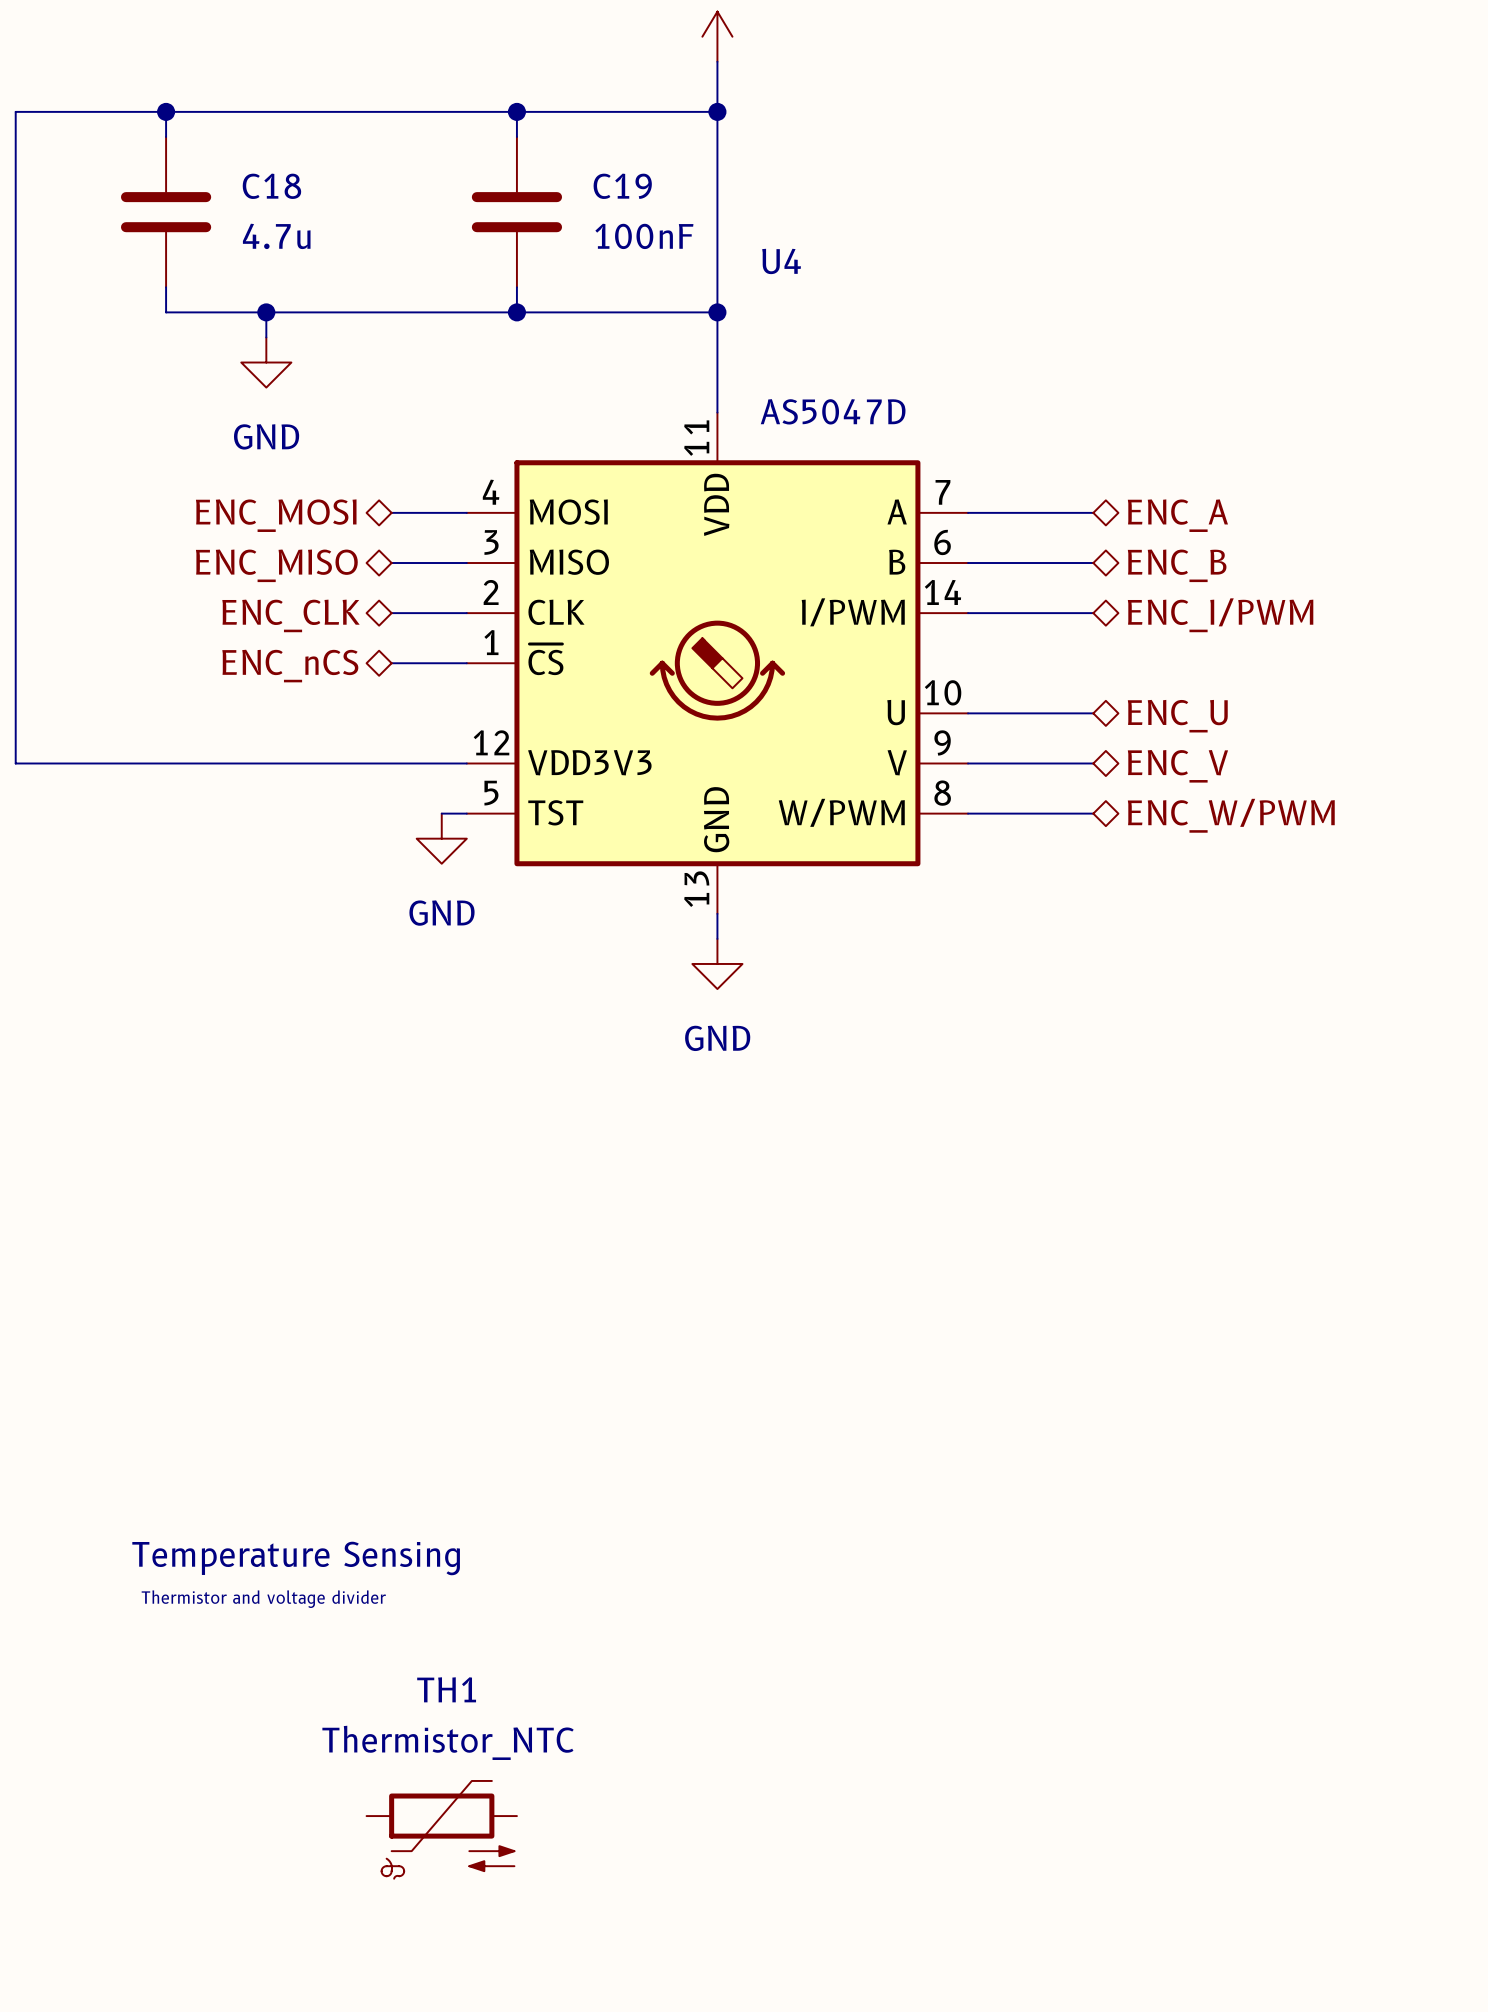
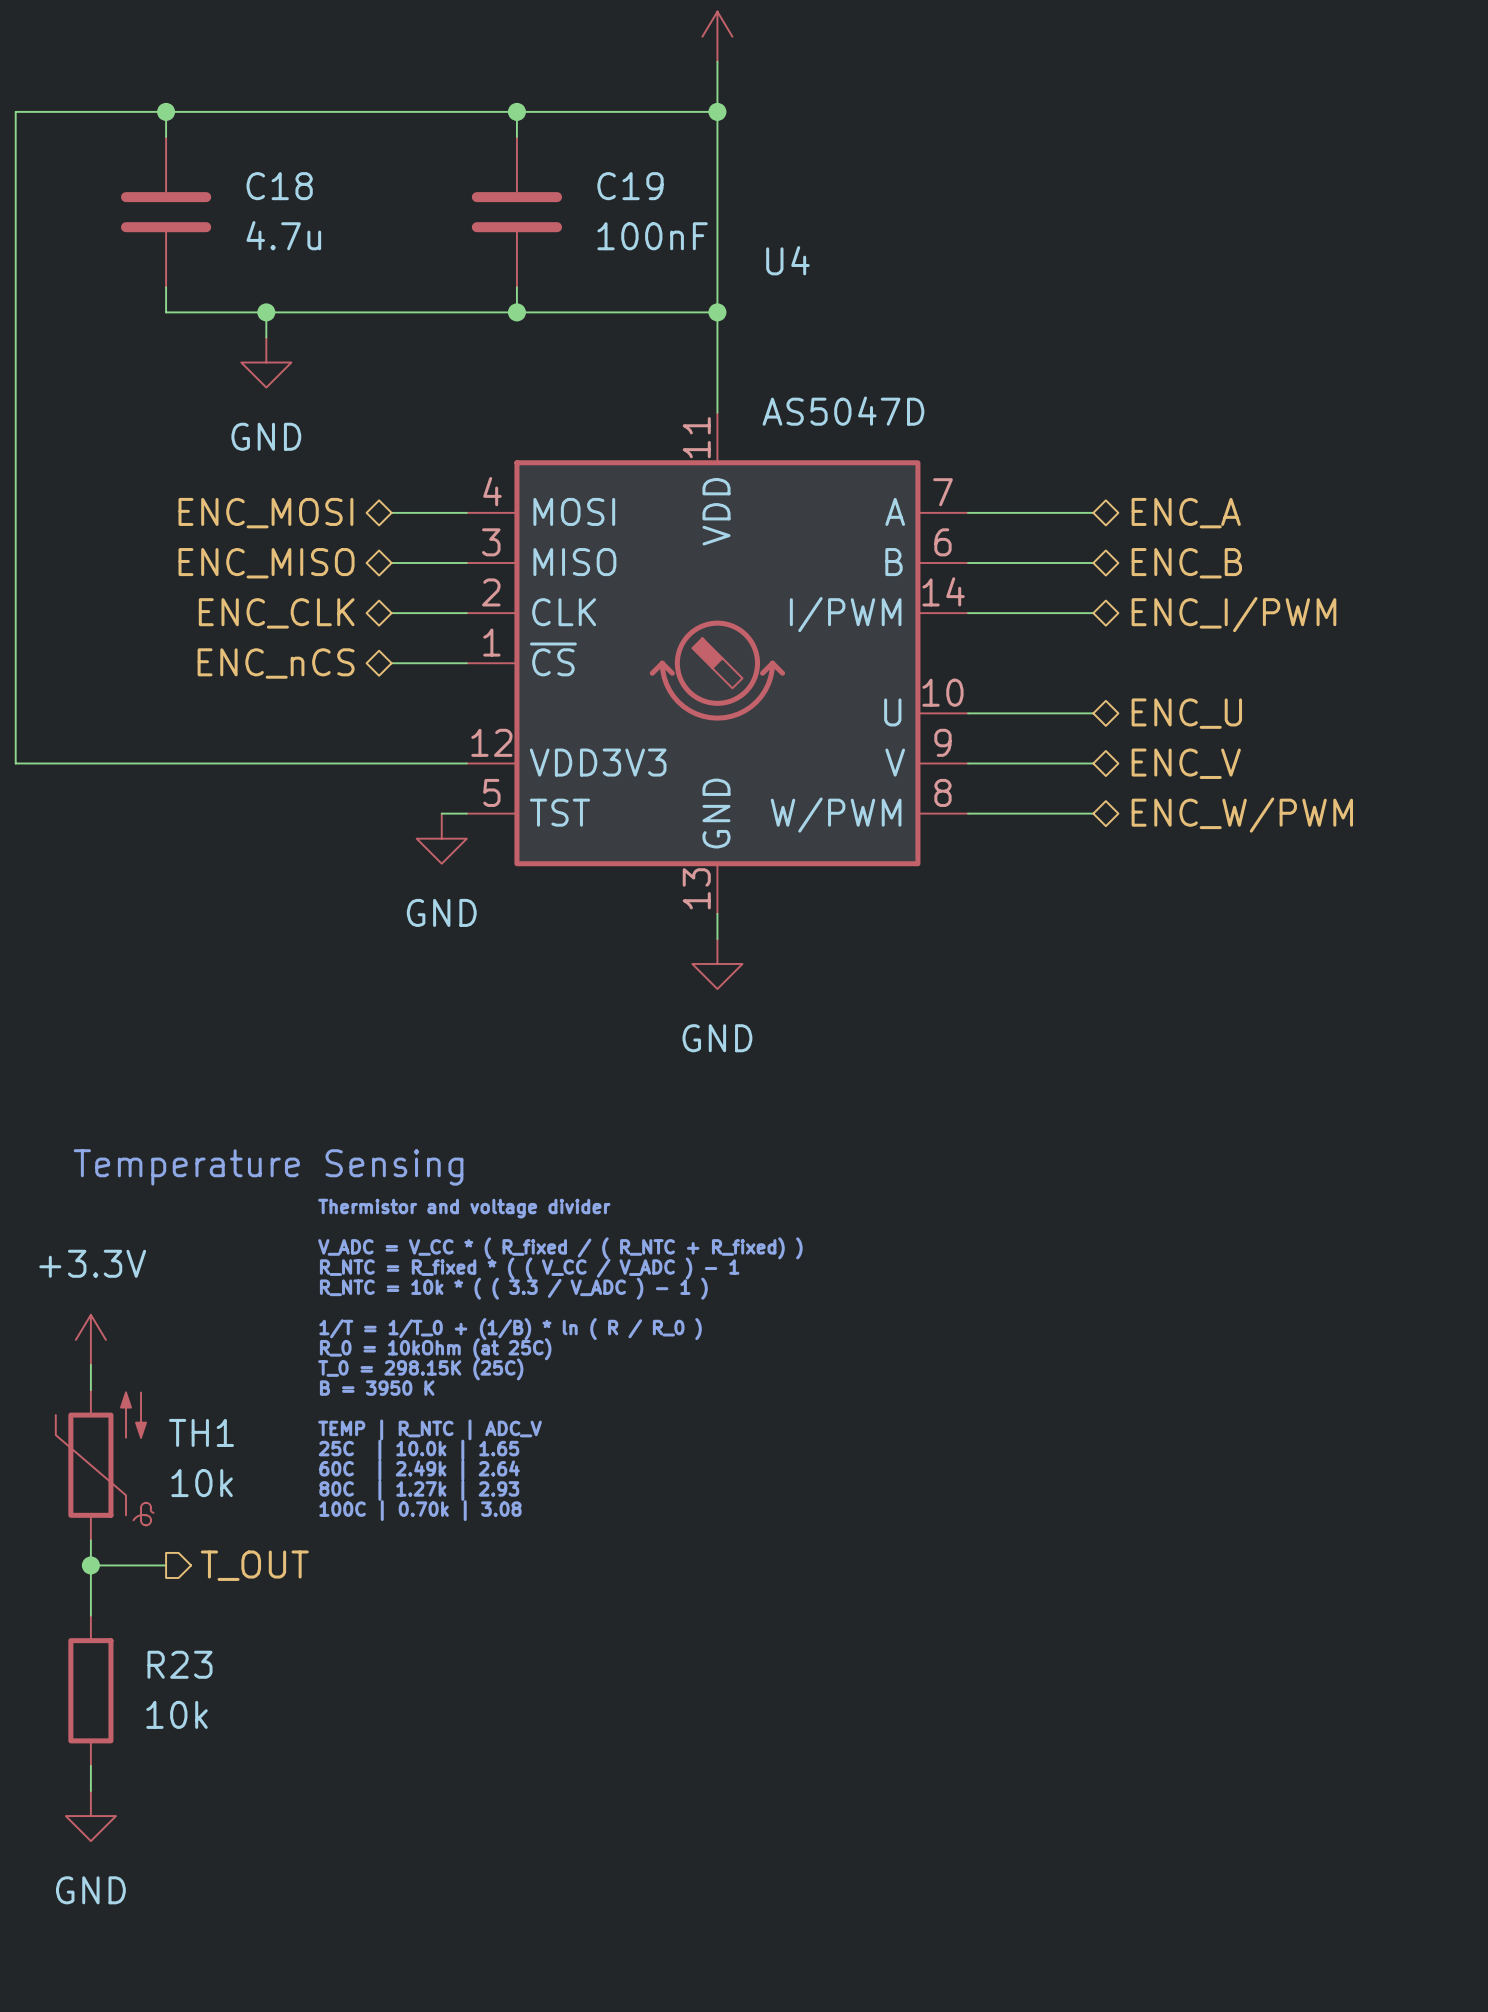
text: none -> V_ADC = V_CC * ( R_fixed / ( R_NTC + R_fixed) ) (560, 1248)
text: none -> R_NTC = R_fixed * ( ( V_CC / V_ADC ) - 1 (529, 1268)
text: none -> R_NTC = 10k * ( ( 3.3 / V_ADC ) - 1 ) (513, 1288)
text: none -> 1/T = 1/T_0 + (1/B) * ln ( R / R_0 ) (510, 1329)
power symbol: none -> +3.3V (90, 1339)
text: none -> R_0 = 10kOhm (at 25C) (435, 1349)
wire: none -> (90, 1364) (90, 1390)
text: none -> T_0 = 298.15K (25C) (420, 1369)
text: none -> B = 3950 K (377, 1388)
text: none -> TEMP | R_NTC | ADC_V (430, 1429)
text: none -> 25C | 10.0k | 1.65 (418, 1450)
text: none -> 60C | 2.49k | 2.64 (419, 1470)
text: none -> 80C | 1.27k | 2.93 (419, 1490)
text: none -> 100C | 0.70k | 3.08 (420, 1510)
wire: none -> (90, 1540) (90, 1615)
text position: Temperature Sensing (296, 1558) -> Temperature Sensing (268, 1167)
wire: none -> (90, 1565) (166, 1565)
junction: none -> (90, 1565)
hierarchical label: none -> T_OUT (254, 1565)
text position: Thermistor and voltage divider (263, 1599) -> Thermistor and voltage divider (464, 1208)
TH1 name position: TH1 (446, 1689) -> TH1 (201, 1432)
R23: none -> 10k (90, 1690)
TH1 value: Thermistor_NTC (448, 1742) -> 10k (202, 1483)
wire: none -> (90, 1765) (90, 1791)
power symbol: none -> GND (90, 1816)
TH1 position: (441, 1829) -> (104, 1465)
TH1 rotation: 0° (448, 1829) -> 90° counterclockwise (104, 1458)

